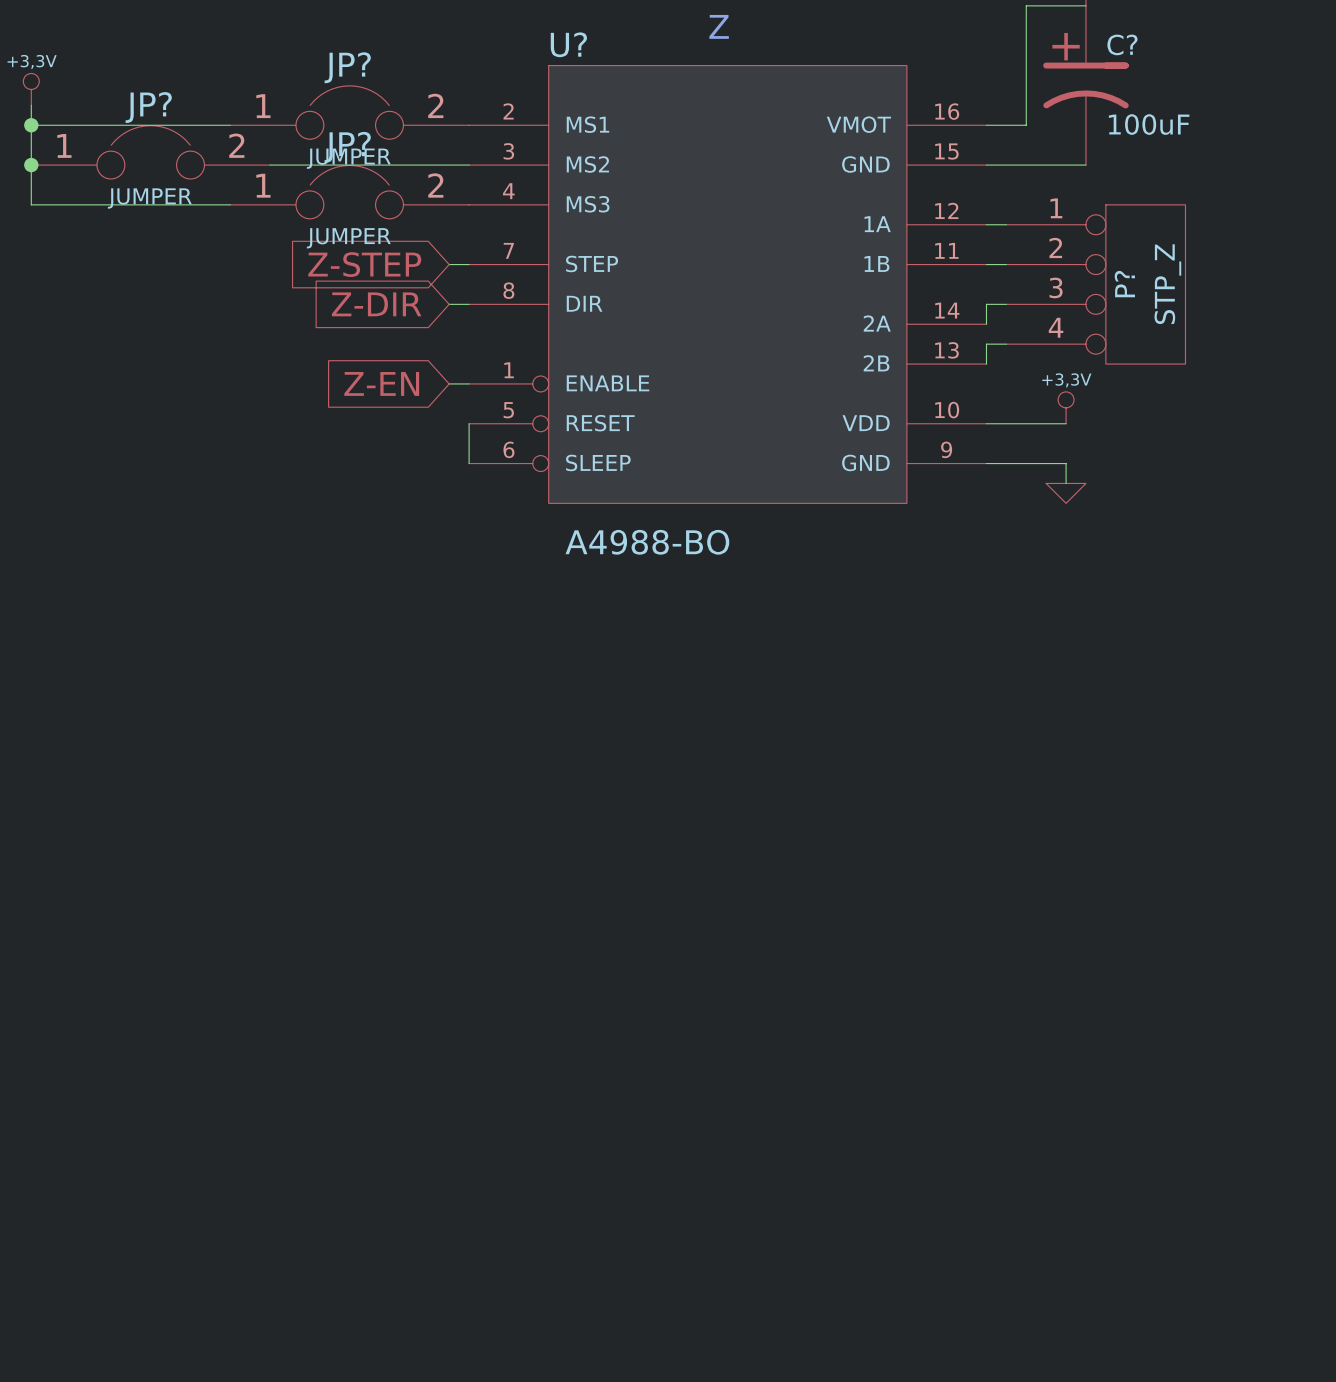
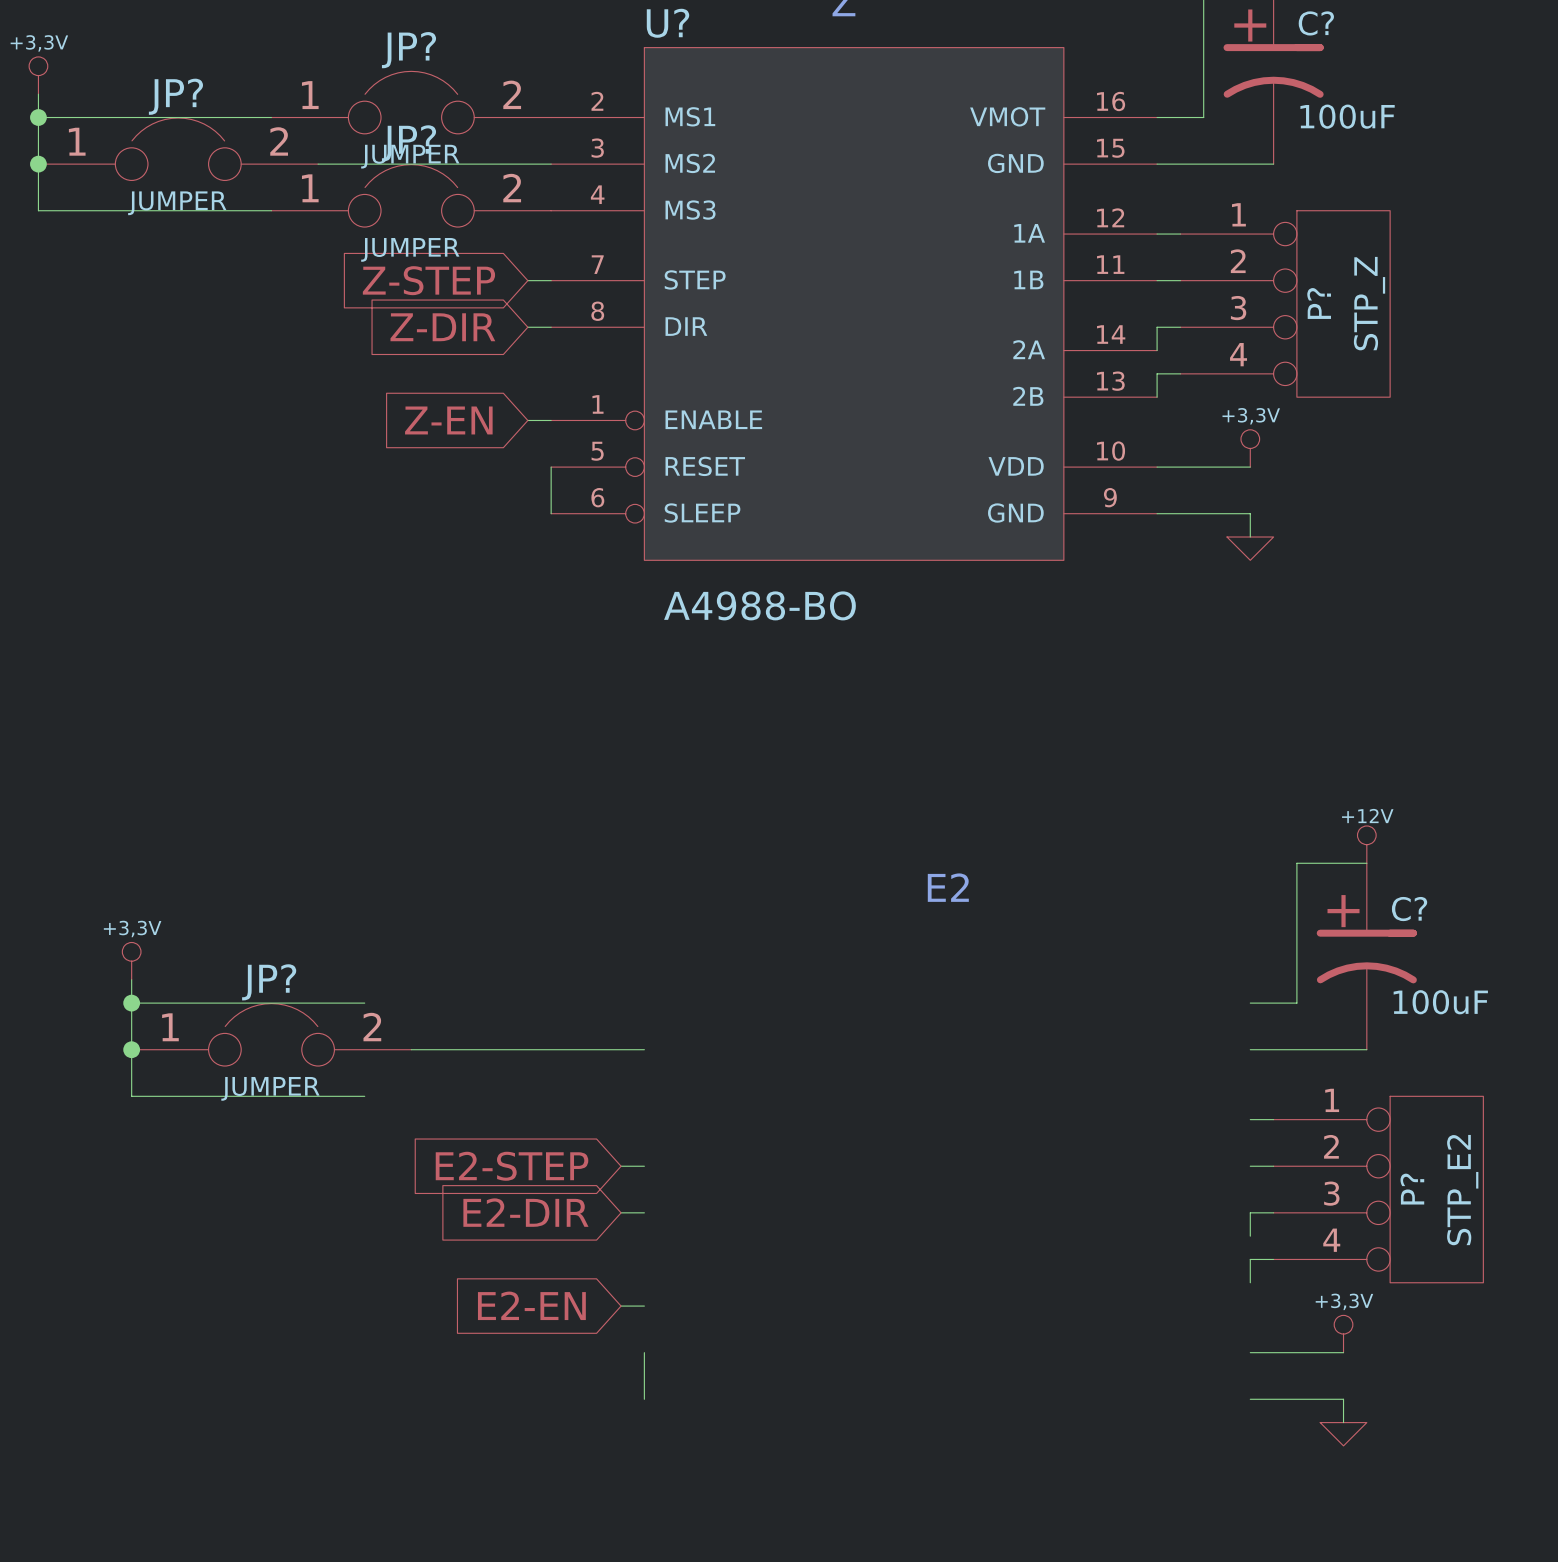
power symbol: none -> +12V (1366, 844)
wire: none -> (1366, 863) (1296, 863) (1296, 1003) (1250, 1003)
text: none -> E2 (948, 887)
C?: none -> 100uF (1366, 956)
power symbol: none -> +3,3V (131, 961)
wire: none -> (131, 979) (131, 1096) (364, 1096)
wire: none -> (131, 1003) (364, 1003)
junction: none -> (131, 1003)
JP?: none -> JUMPER (271, 1034)
junction: none -> (131, 1049)
wire: none -> (411, 1049) (644, 1049)
wire: none -> (1250, 1049) (1366, 1049)
wire: none -> (1250, 1119) (1273, 1119)
global label: none -> E2-STEP (512, 1166)
wire: none -> (621, 1166) (644, 1166)
wire: none -> (1250, 1166) (1273, 1166)
P?: none -> STP_E2 (1378, 1189)
global label: none -> E2-DIR (525, 1212)
wire: none -> (621, 1212) (644, 1212)
wire: none -> (1273, 1212) (1250, 1212) (1250, 1236)
wire: none -> (1273, 1259) (1250, 1259) (1250, 1282)
global label: none -> E2-EN (531, 1305)
wire: none -> (621, 1306) (644, 1306)
power symbol: none -> +3,3V (1343, 1334)
wire: none -> (644, 1352) (644, 1399)
wire: none -> (1250, 1352) (1343, 1352)
wire: none -> (1250, 1399) (1343, 1399) (1343, 1422)
power symbol: none -> (1343, 1434)

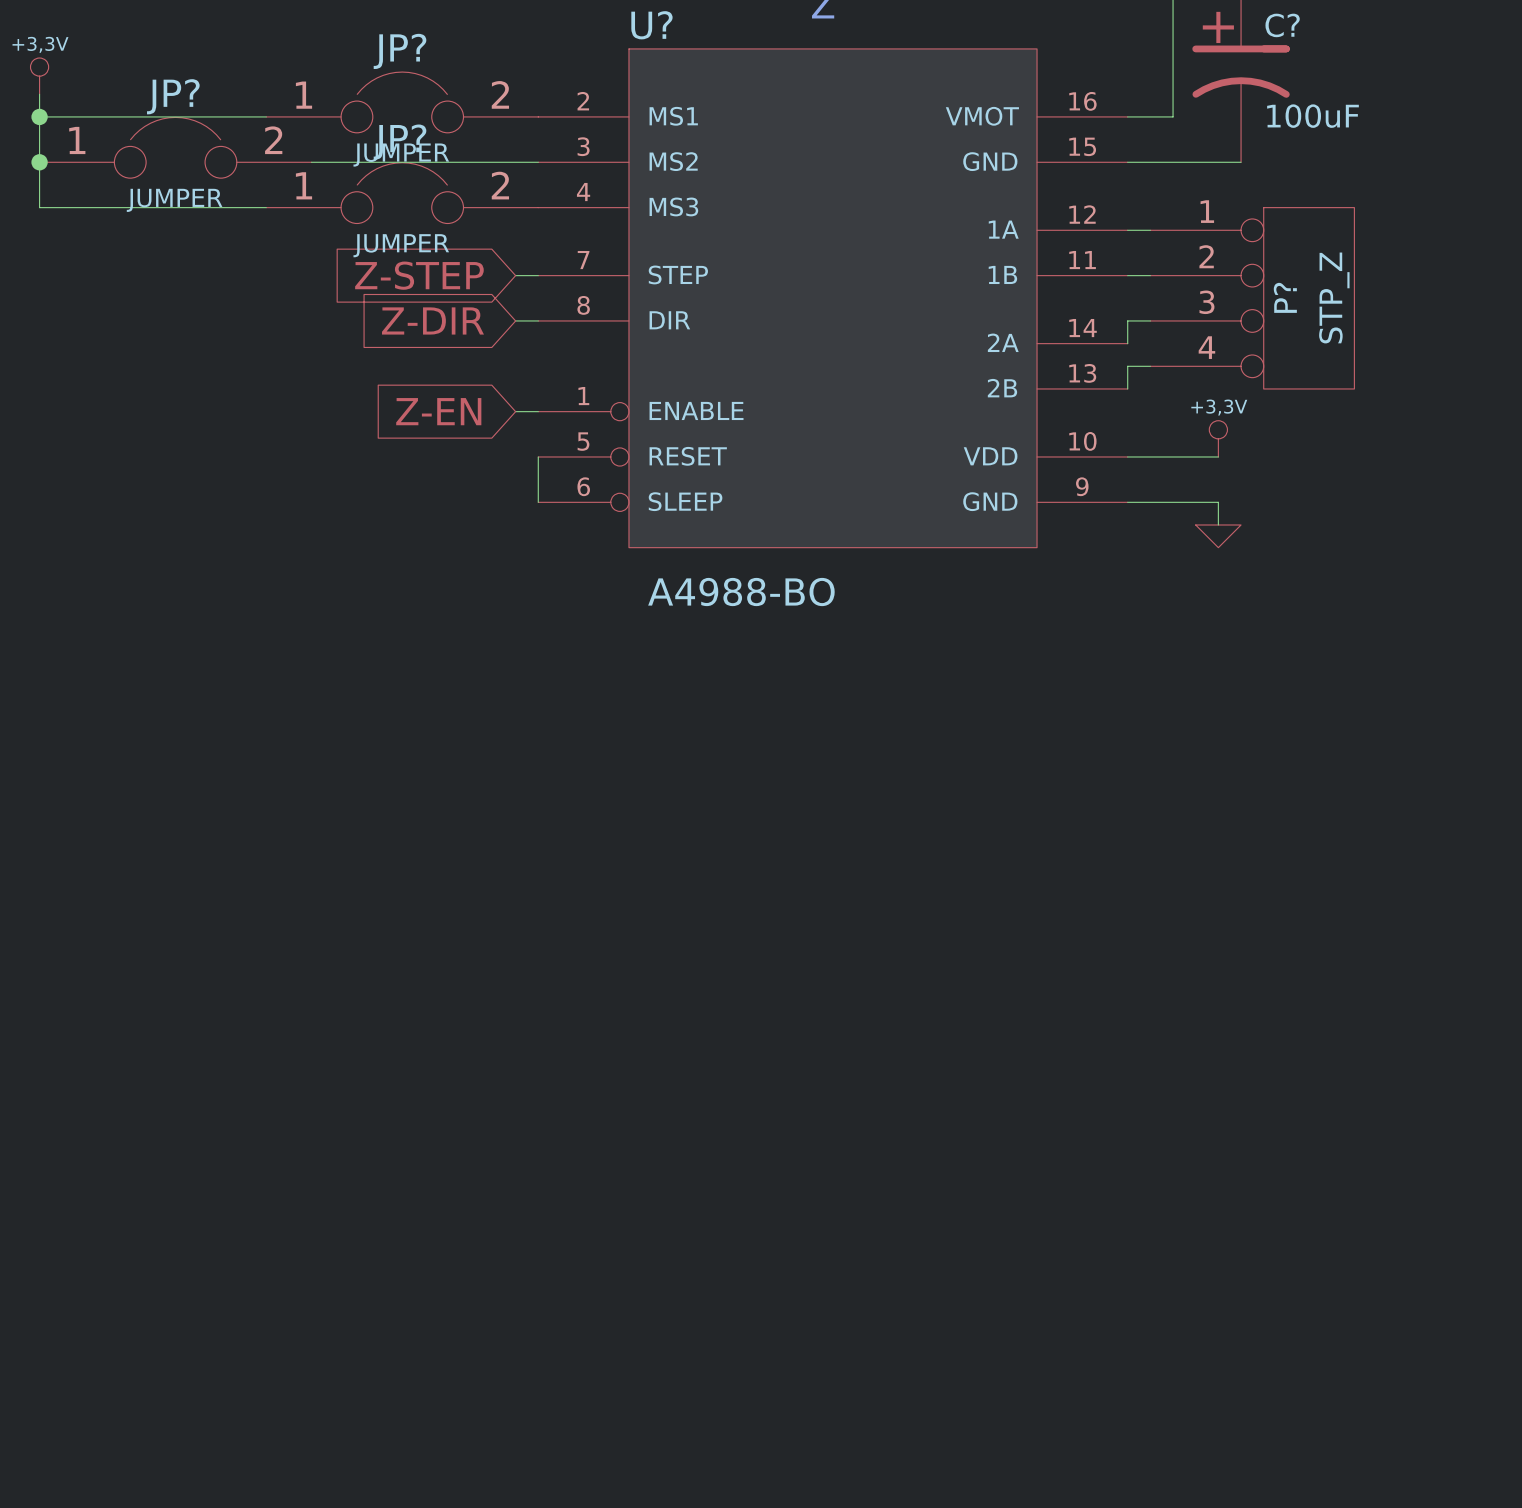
power symbol: +12V (1366, 844) -> none
wire: (1366, 863) (1296, 863) (1296, 1003) (1250, 1003) -> none
text: E2 (948, 887) -> none
C?: 100uF (1366, 956) -> none
power symbol: +3,3V (131, 961) -> none
wire: (131, 979) (131, 1096) (364, 1096) -> none
wire: (131, 1003) (364, 1003) -> none
junction: (131, 1003) -> none
JP?: JUMPER (271, 1034) -> none
junction: (131, 1049) -> none
wire: (411, 1049) (644, 1049) -> none
wire: (1250, 1049) (1366, 1049) -> none
wire: (1250, 1119) (1273, 1119) -> none
global label: E2-STEP (512, 1166) -> none
wire: (621, 1166) (644, 1166) -> none
wire: (1250, 1166) (1273, 1166) -> none
P?: STP_E2 (1378, 1189) -> none
global label: E2-DIR (525, 1212) -> none
wire: (621, 1212) (644, 1212) -> none
wire: (1273, 1212) (1250, 1212) (1250, 1236) -> none
wire: (1273, 1259) (1250, 1259) (1250, 1282) -> none
global label: E2-EN (531, 1305) -> none
wire: (621, 1306) (644, 1306) -> none
power symbol: +3,3V (1343, 1334) -> none
wire: (644, 1352) (644, 1399) -> none
wire: (1250, 1352) (1343, 1352) -> none
wire: (1250, 1399) (1343, 1399) (1343, 1422) -> none
power symbol: (1343, 1434) -> none

